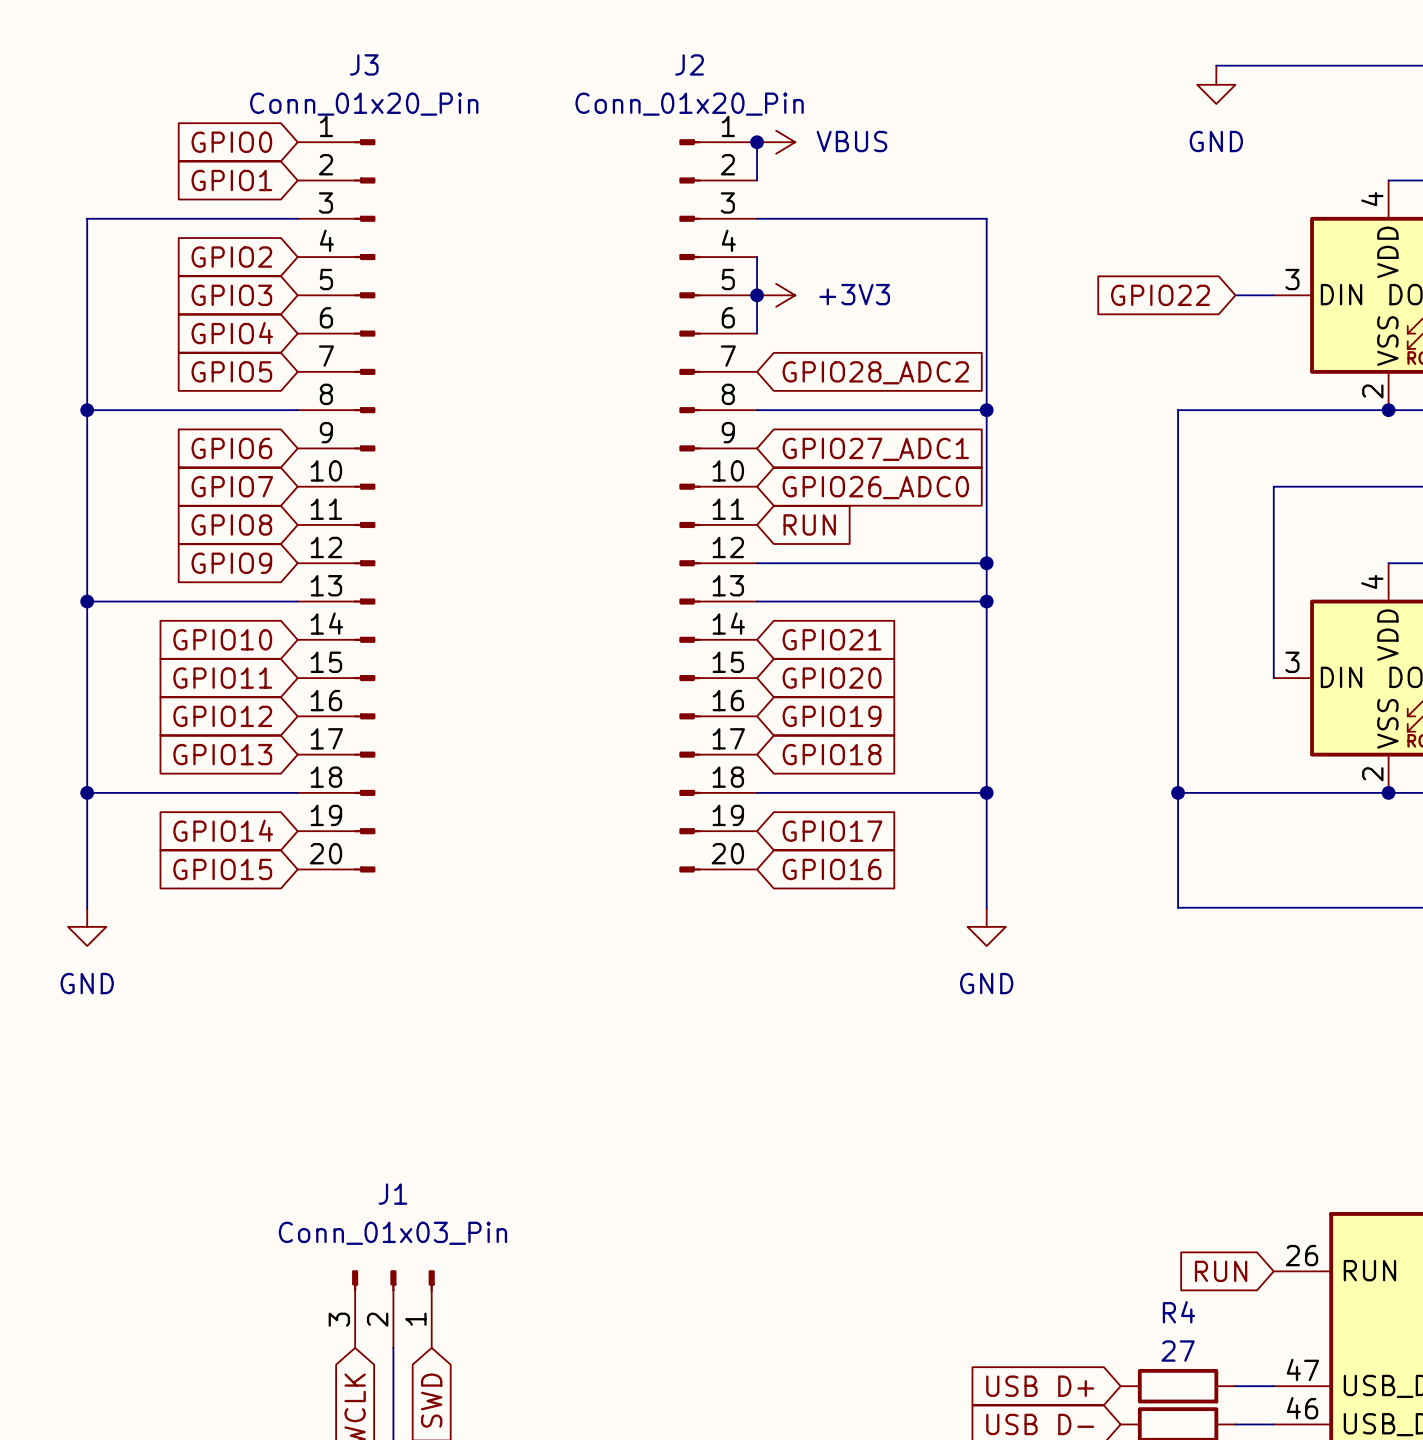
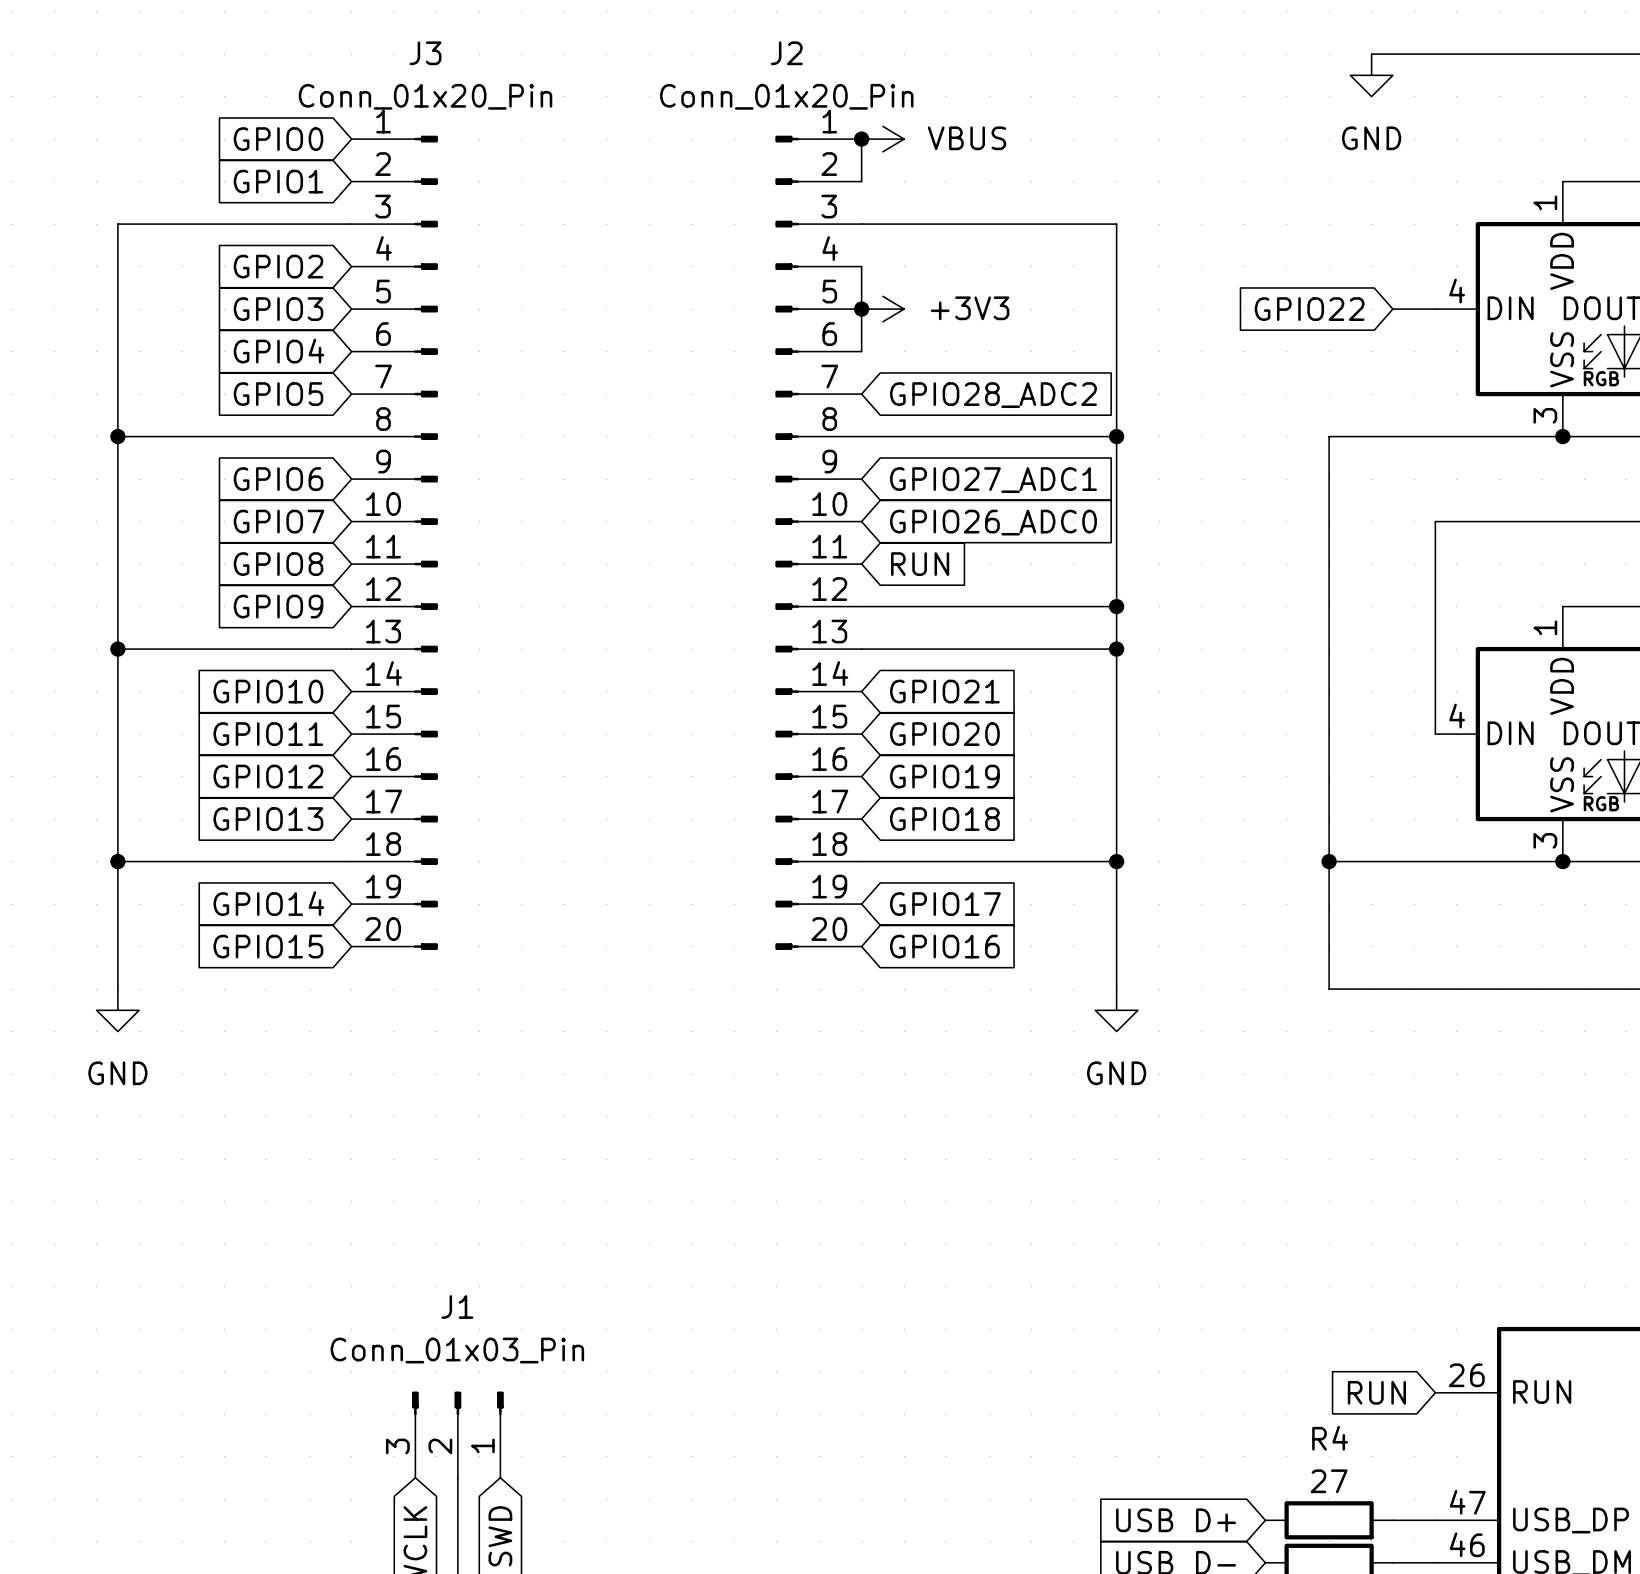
part pin number: 4 (1372, 199) -> 1 (1545, 202)
part pin number: 3 (1292, 279) -> 4 (1457, 291)
part pin number: 2 (1372, 391) -> 3 (1545, 415)
part pin number: 4 (1372, 581) -> 1 (1545, 627)
part pin number: 3 (1292, 662) -> 4 (1457, 716)
part pin number: 2 (1372, 774) -> 3 (1545, 840)

